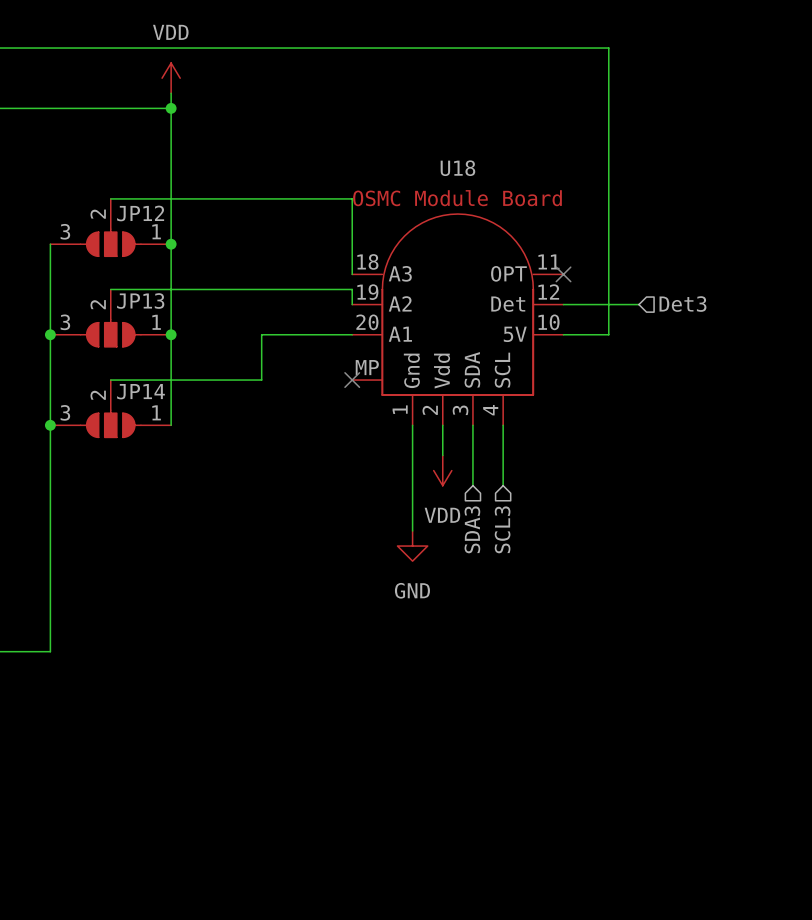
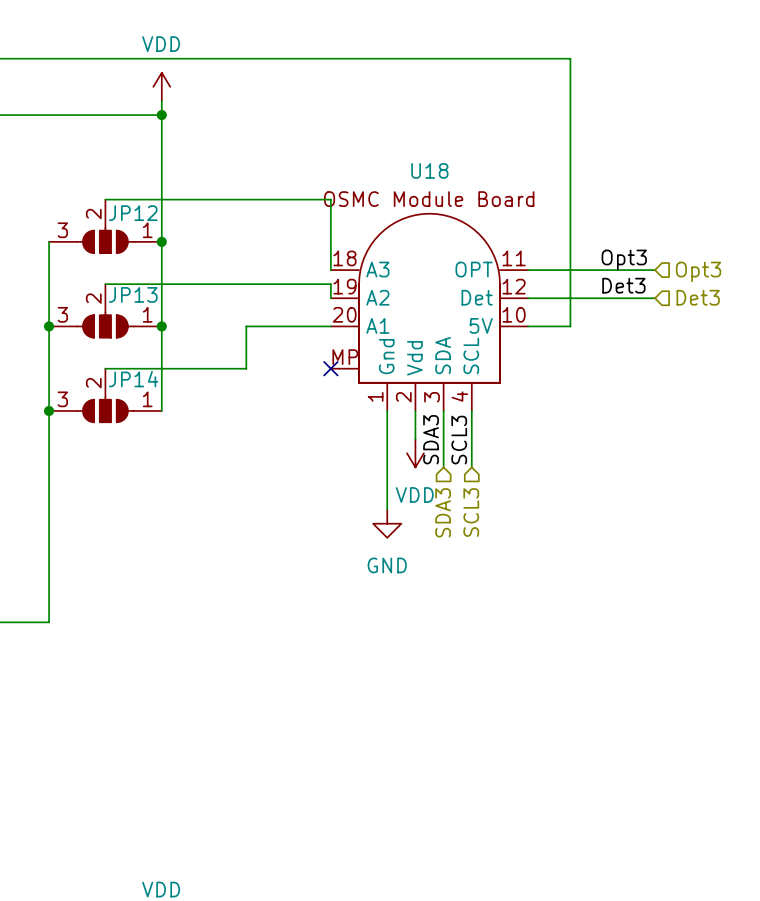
label: none -> Opt3 (624, 259)
wire: none -> (528, 270) (654, 270)
no-connect mark: (563, 274) -> none
hierarchical label: none -> Opt3 (698, 271)
label: none -> Det3 (623, 285)
wire: none -> (598, 298) (654, 298)
hierarchical label position: Det3 (682, 304) -> Det3 (698, 297)
label: none -> SDA3 (431, 439)
label: none -> SCL3 (459, 440)

